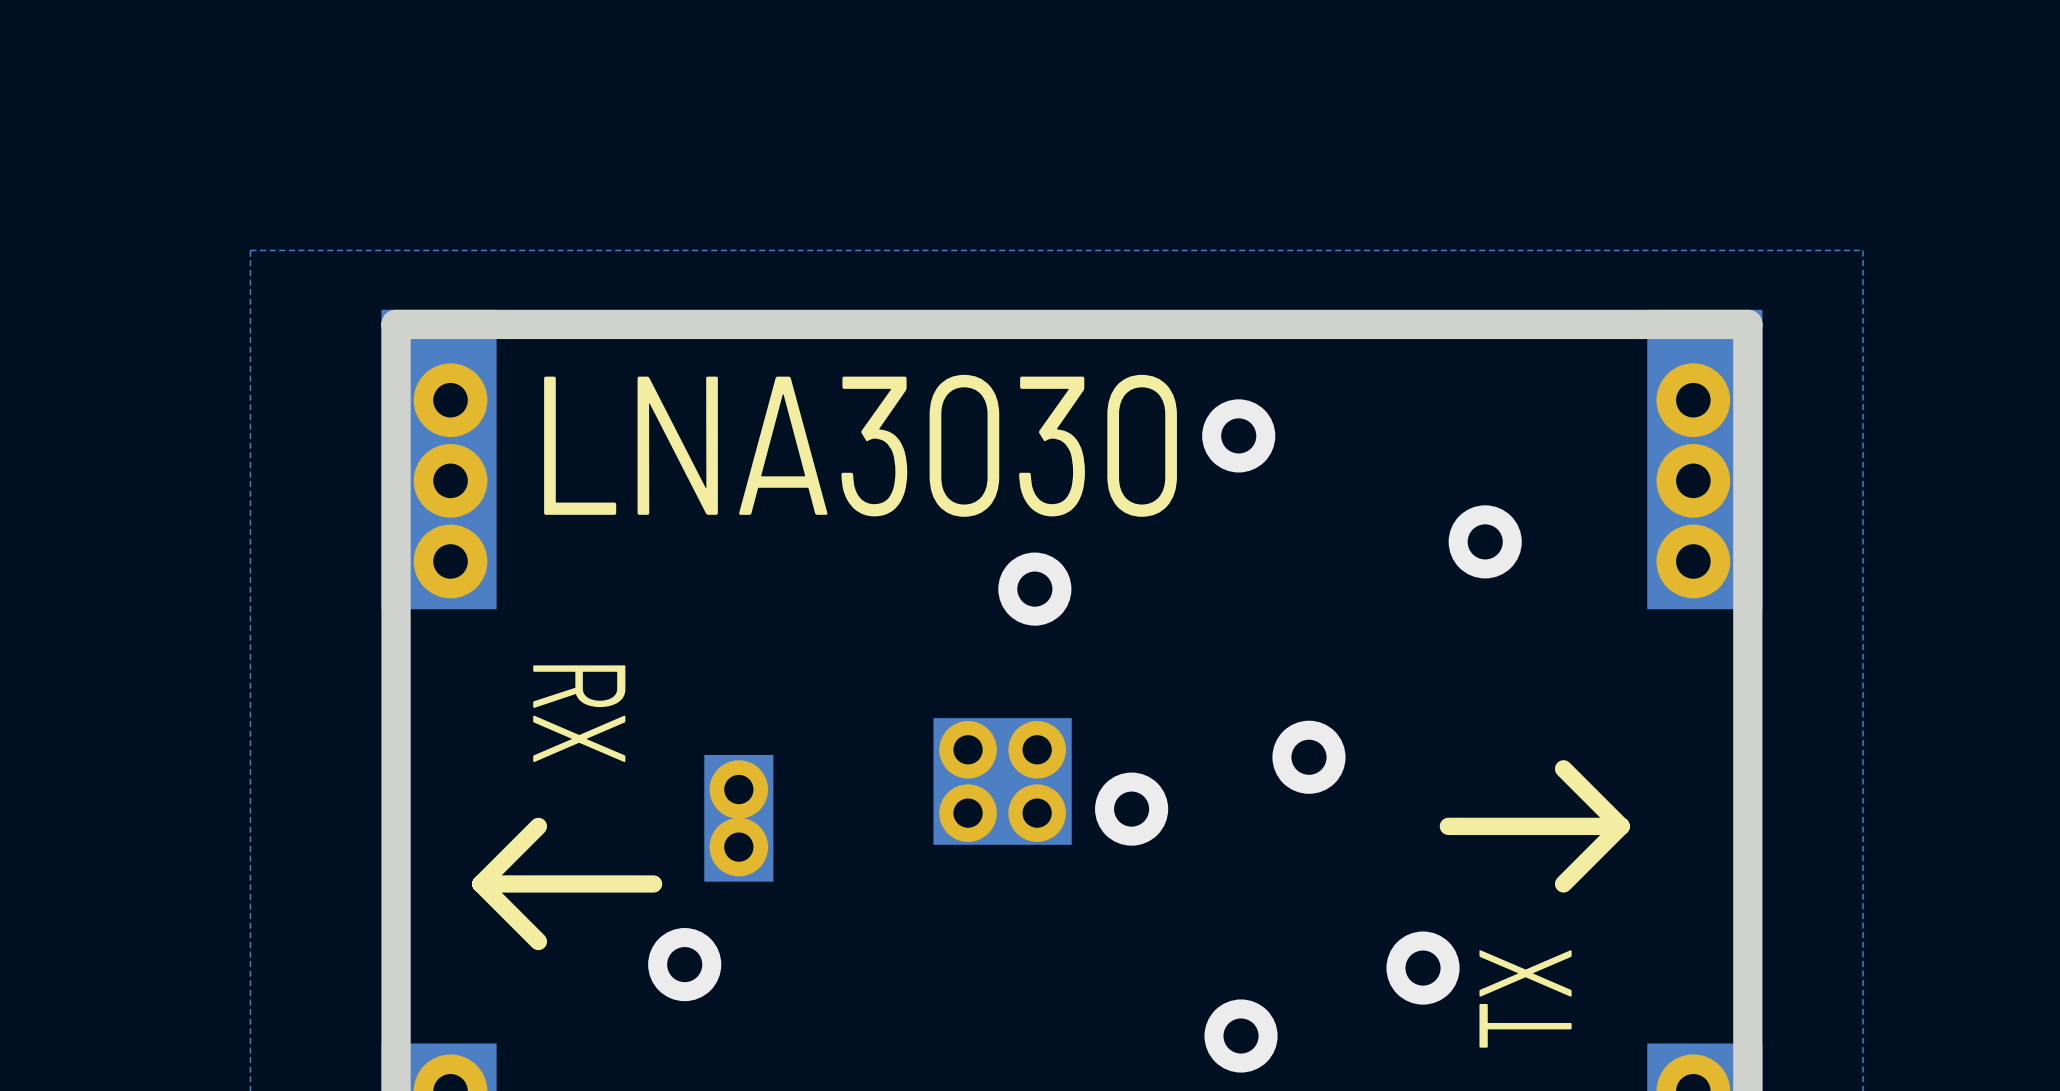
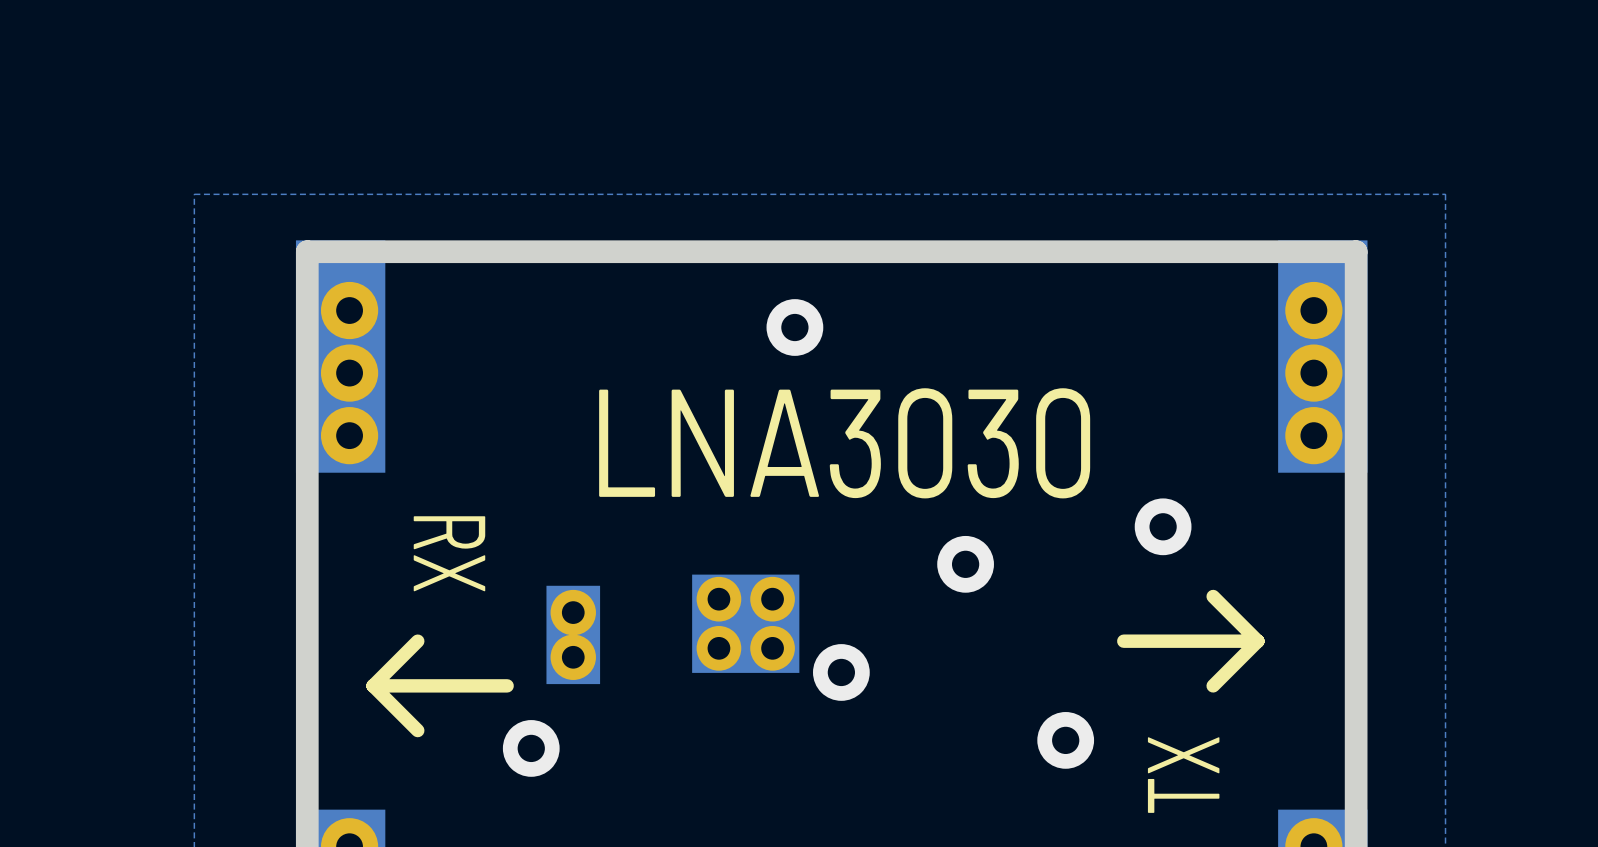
via: none -> (794, 327)
via: (1238, 435) -> none
text position: LNA3030 (860, 445) -> LNA3030 (844, 443)
via: (1485, 541) -> none
via: (1034, 589) -> none
via: none -> (1163, 526)
via position: (1308, 757) -> (965, 564)
part position: (1002, 781) -> (745, 623)
via position: (1131, 809) -> (841, 672)
via position: (1423, 968) -> (1065, 740)
via: (1241, 1036) -> none

